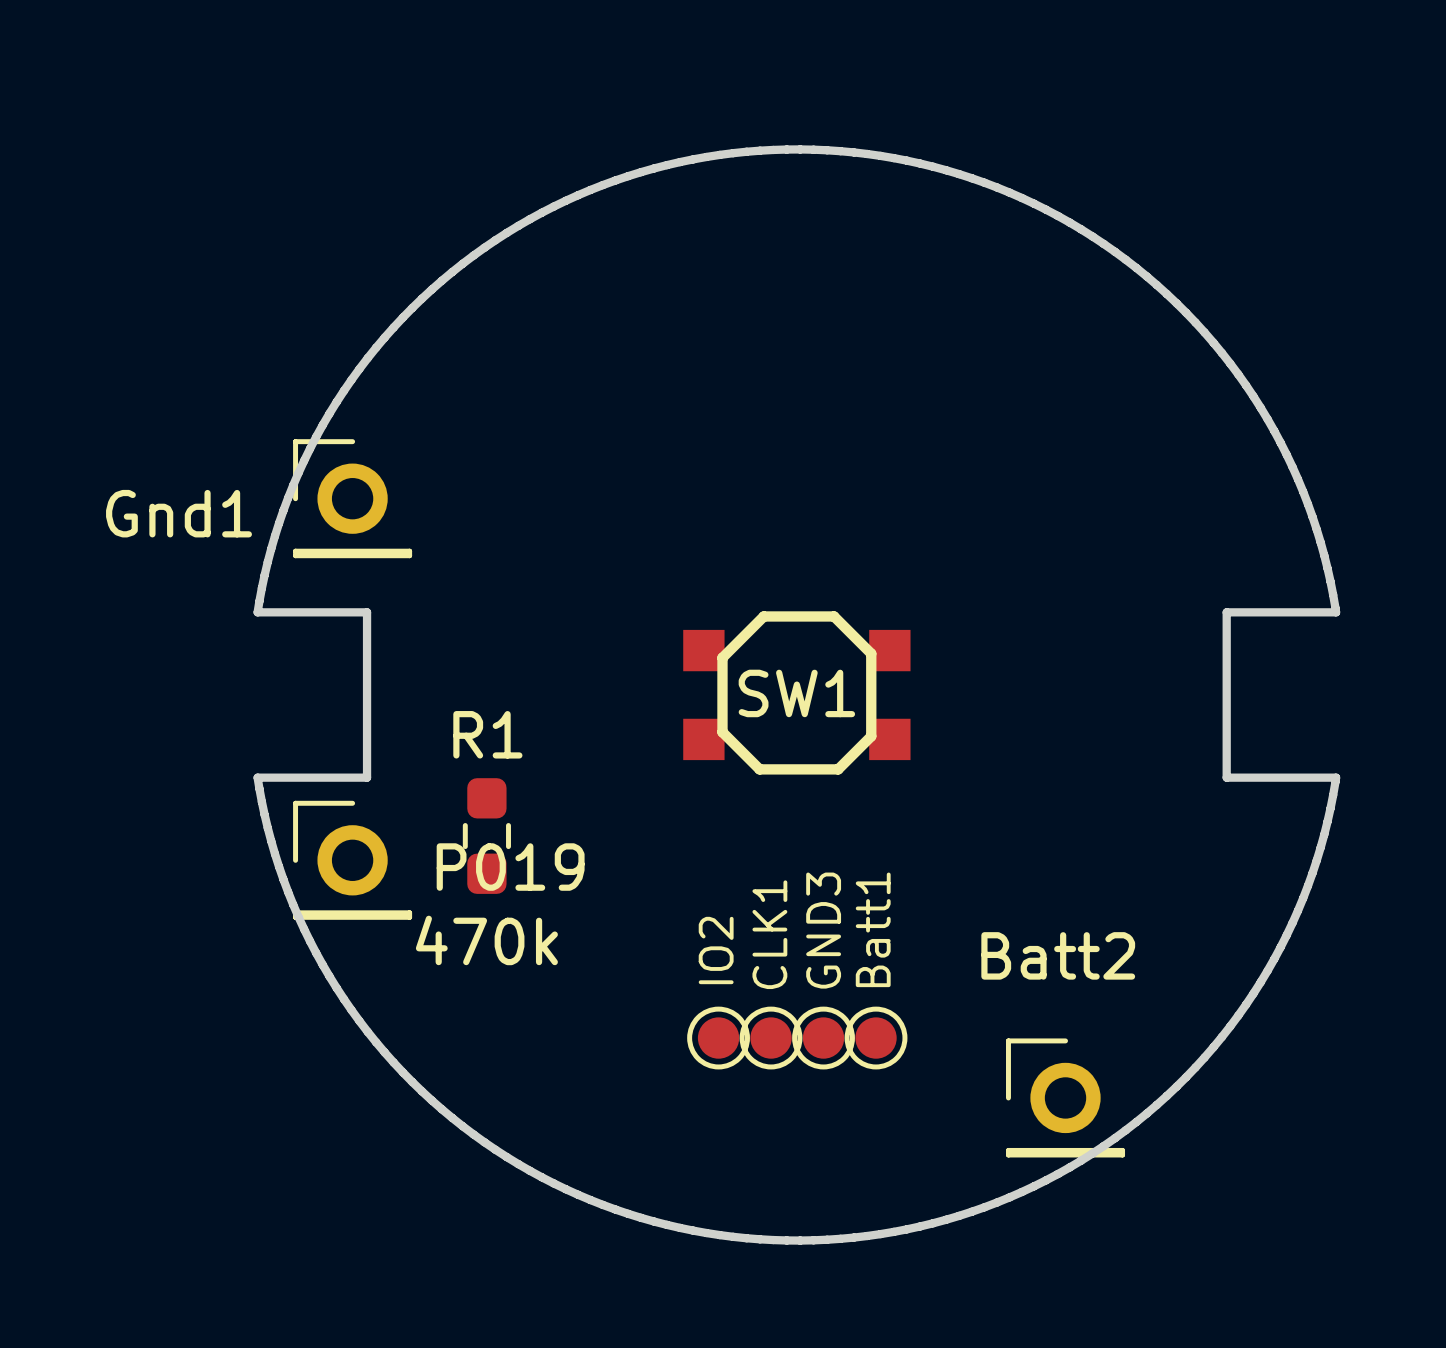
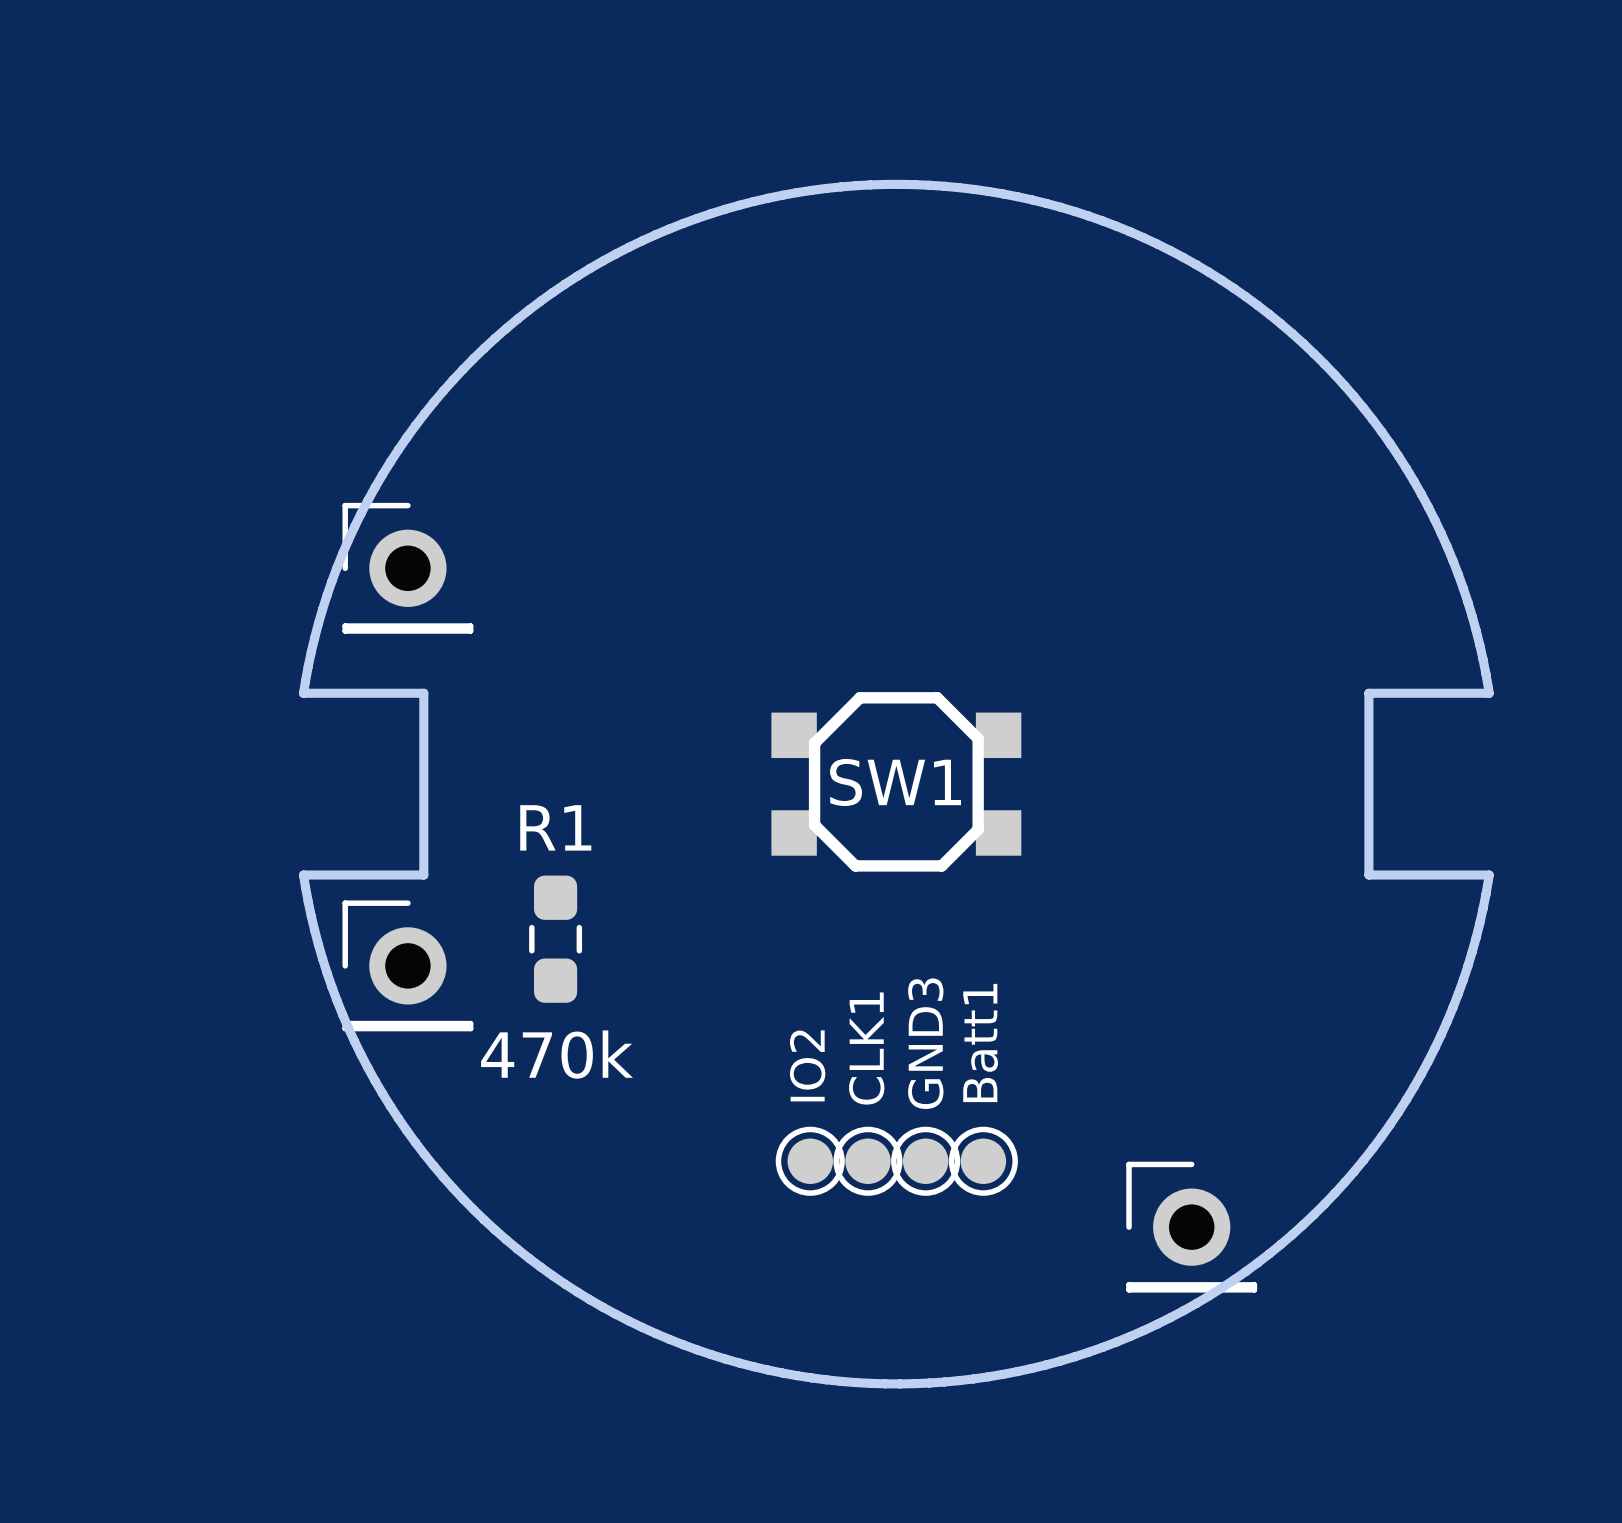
Gnd1 name: Gnd1 (179, 513) -> none
P019 name: P019 (510, 867) -> none
Batt2 name: Batt2 (1058, 955) -> none

